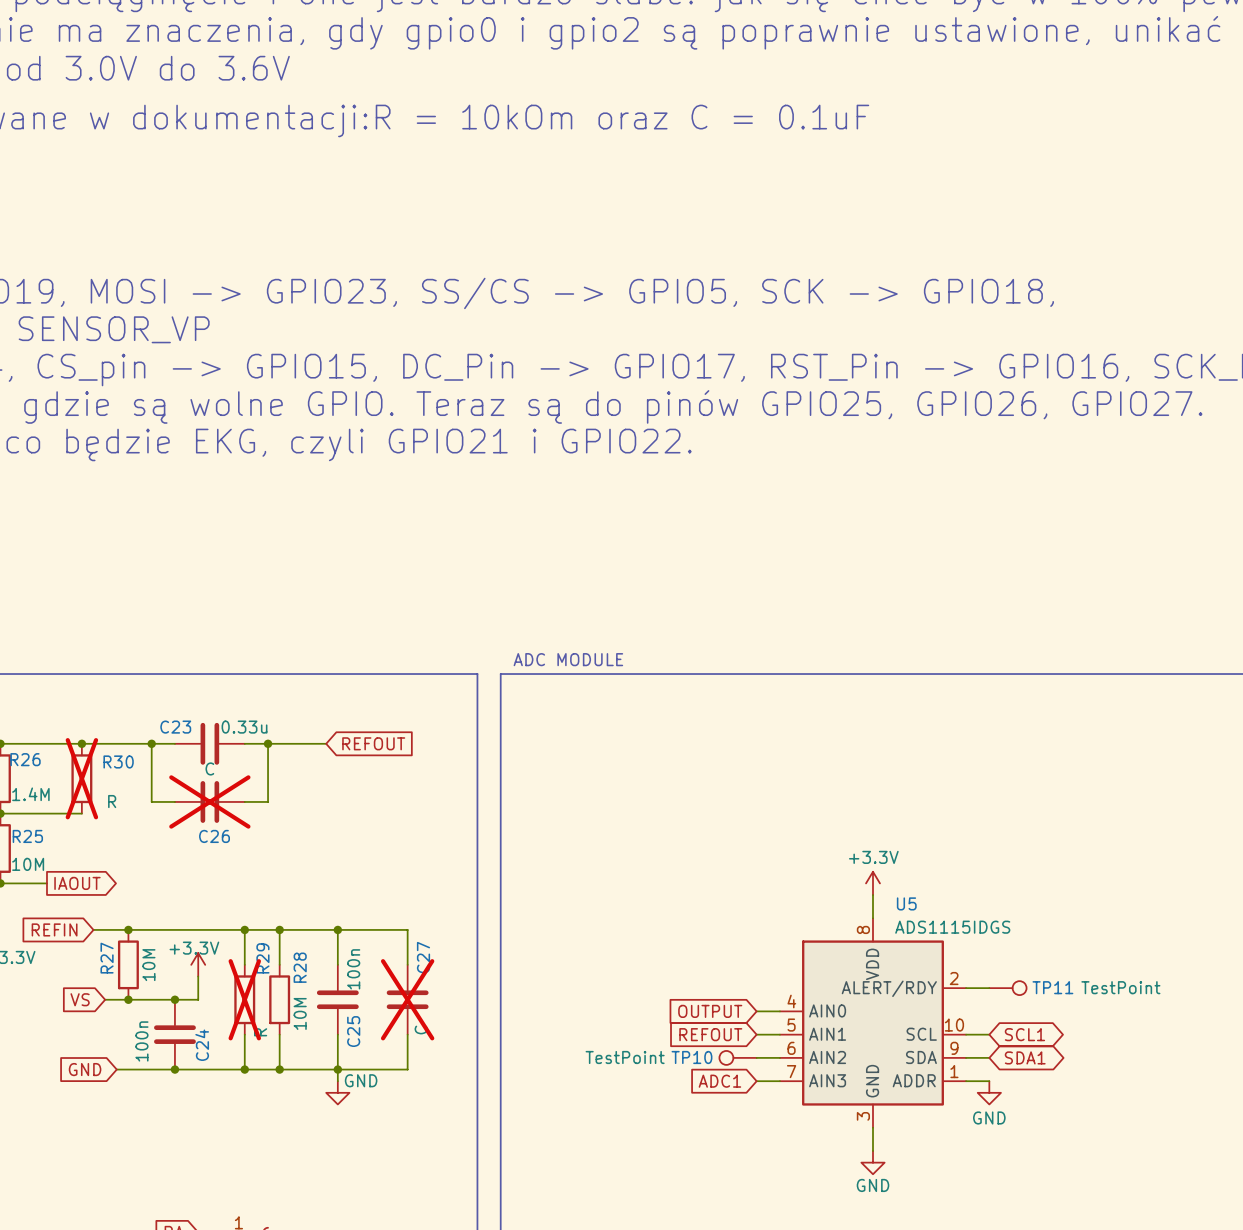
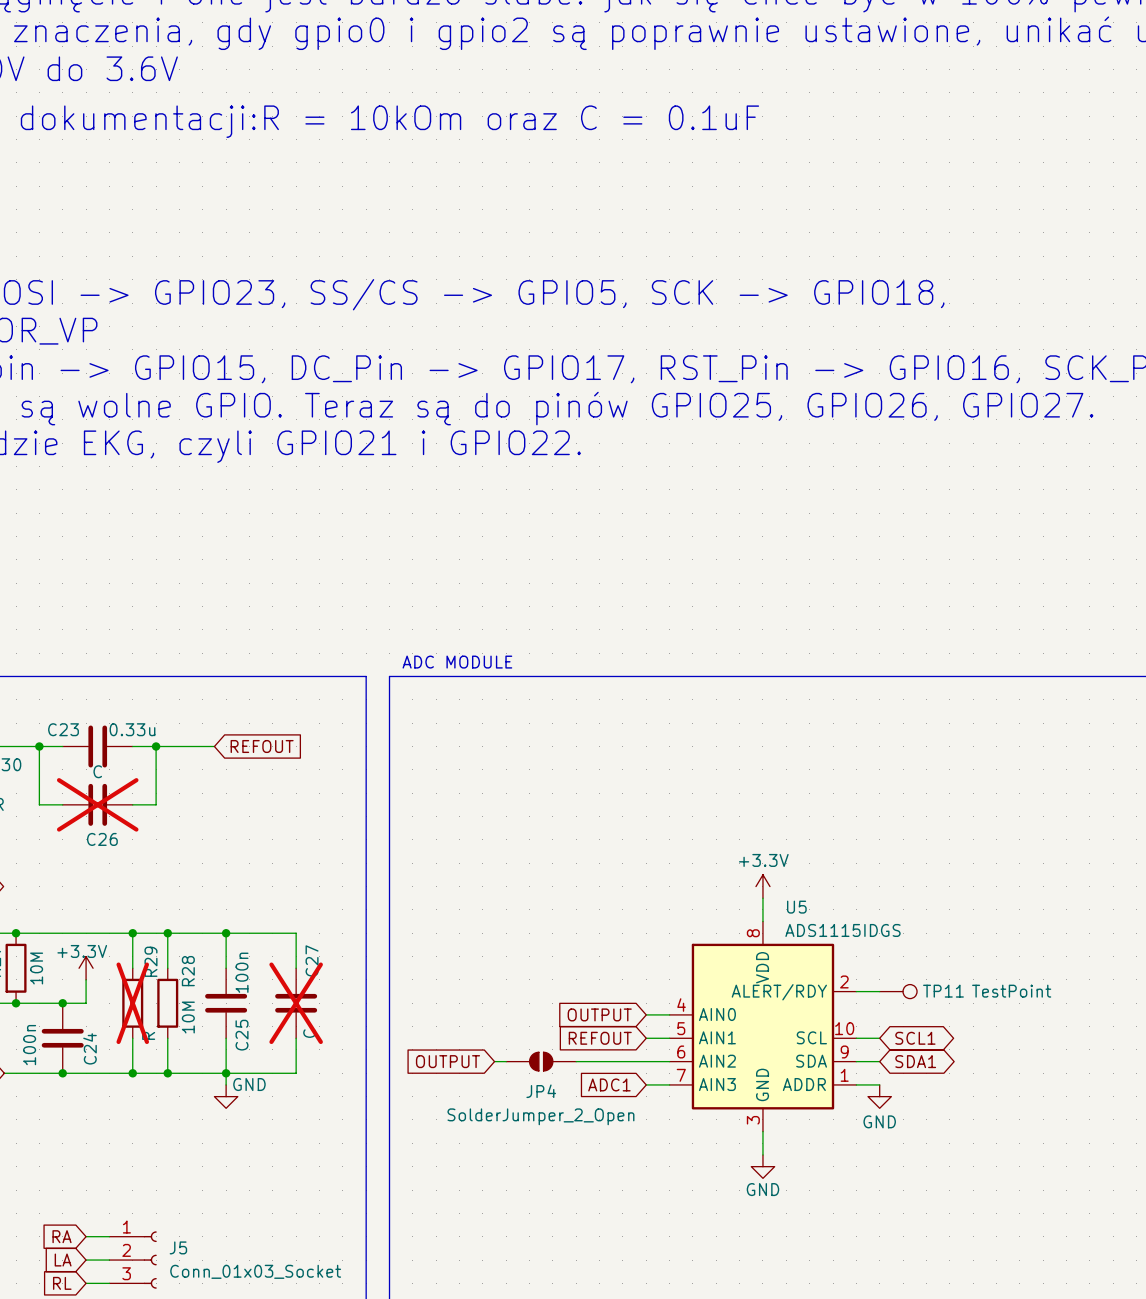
global label: none -> OUTPUT (447, 1061)
wire: none -> (494, 1061) (506, 1061)
JP4: none -> SolderJumper_2_Open (541, 1061)
wire: none -> (576, 1061) (646, 1061)
TP10: TestPoint (738, 1057) -> none

